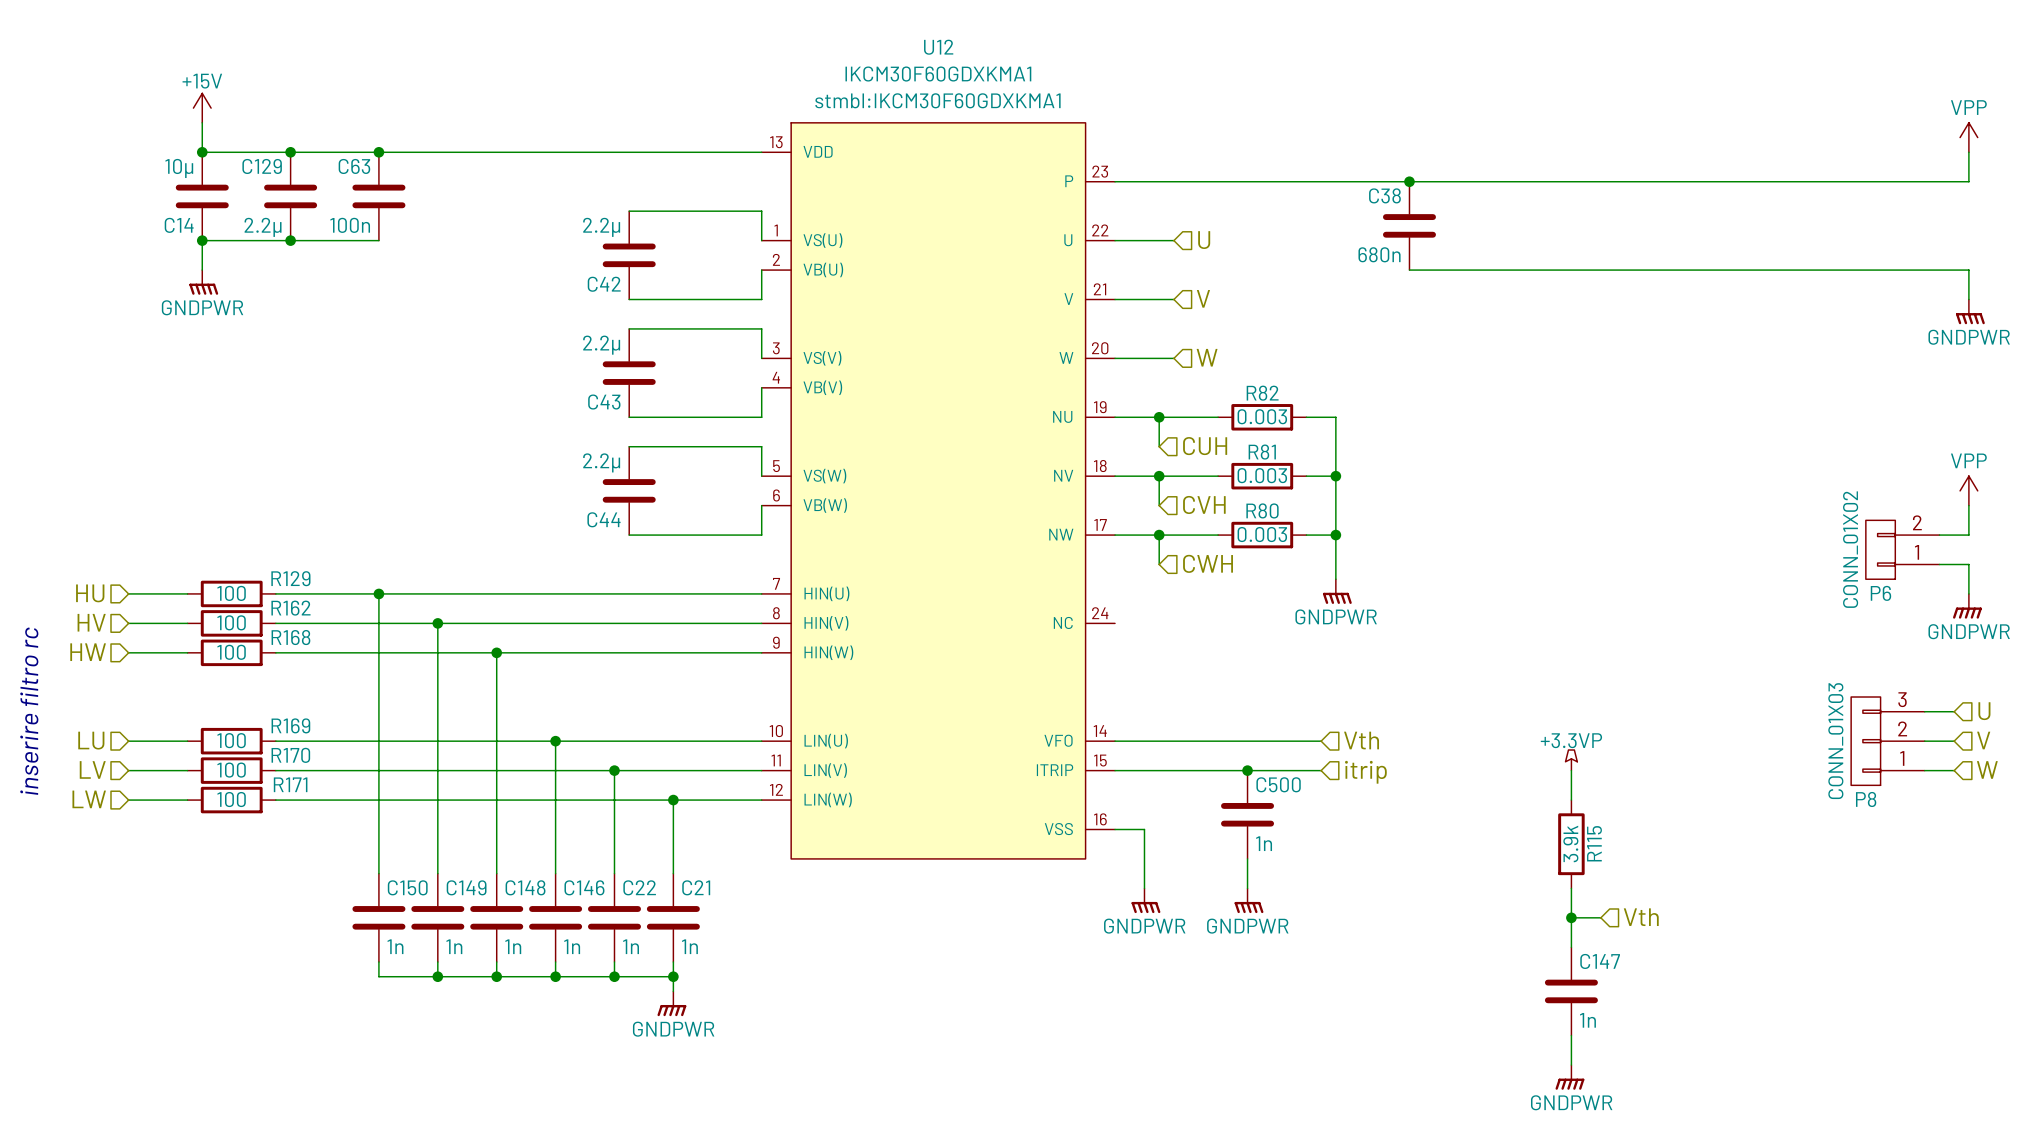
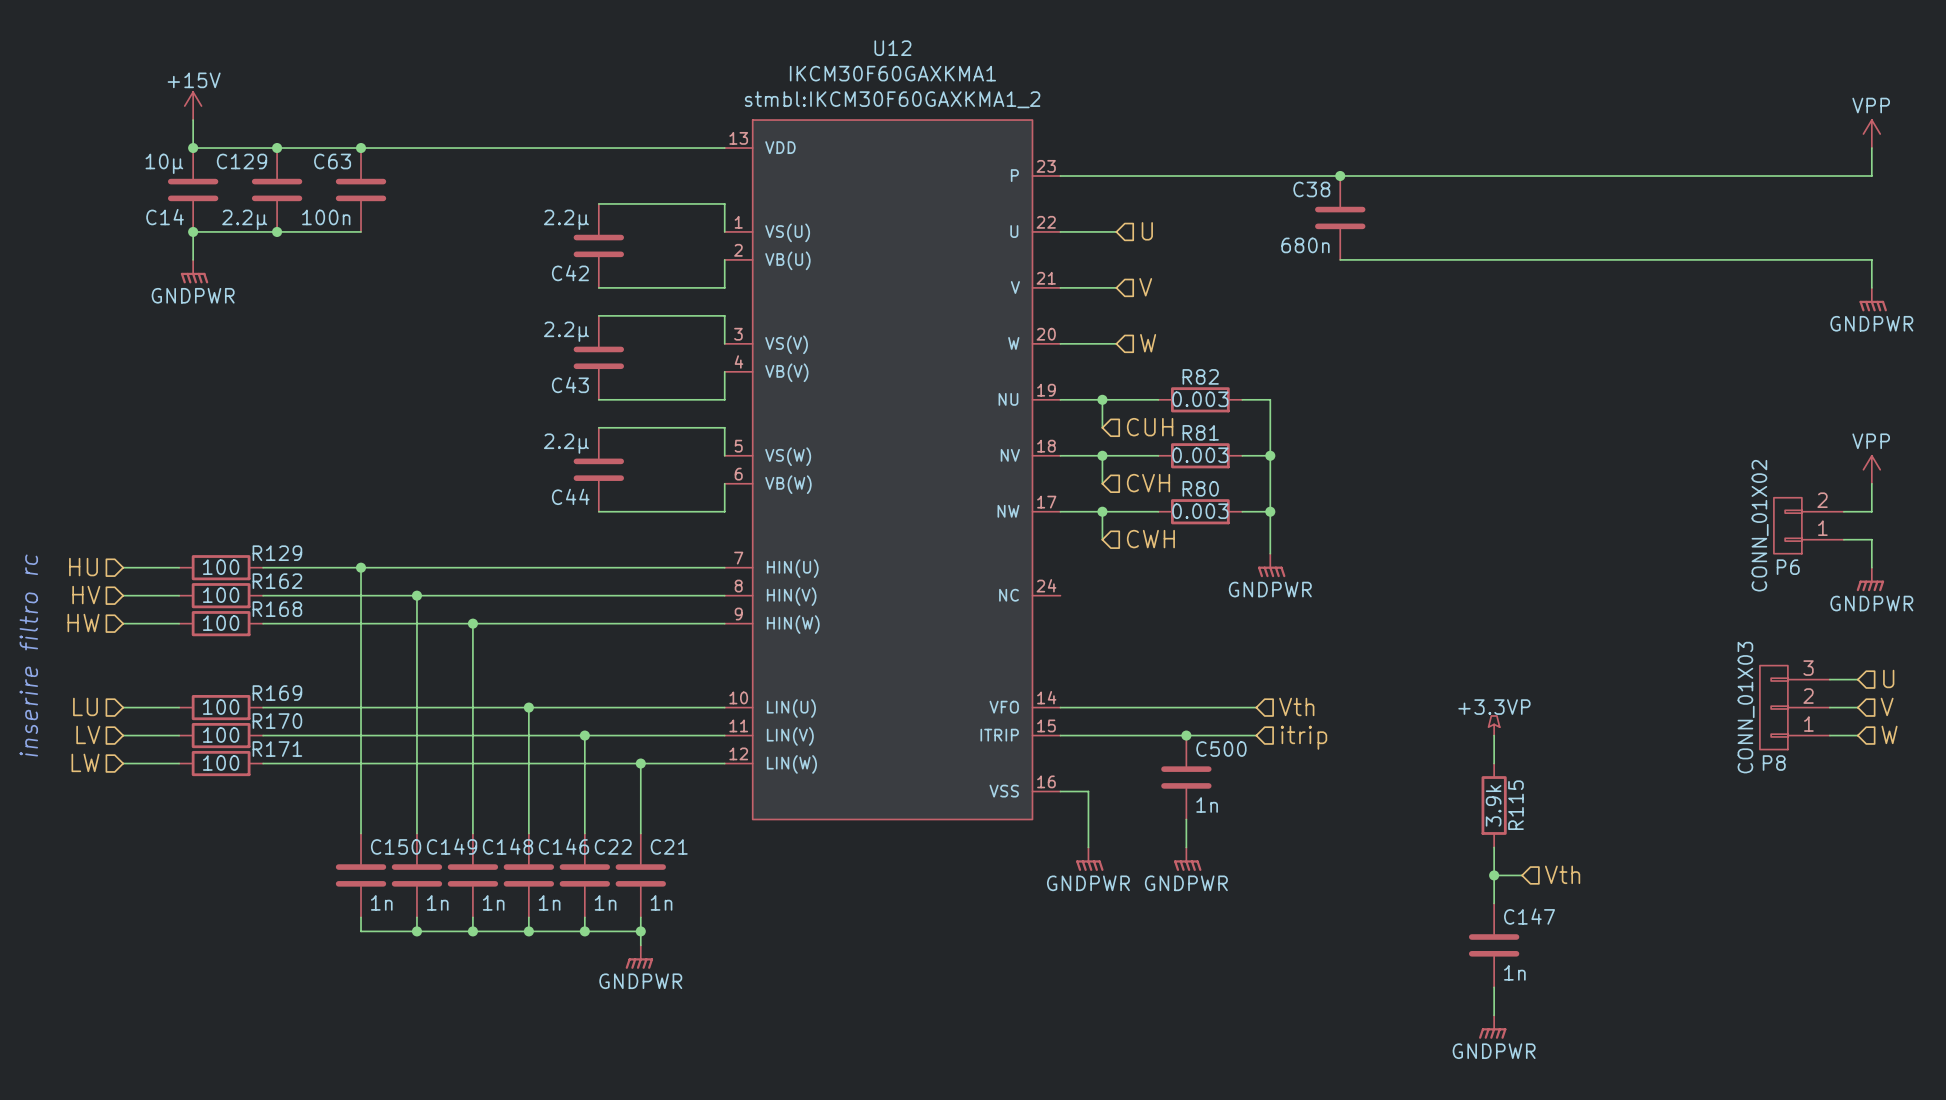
U12 value: IKCM30F60GDXKMA1 (938, 74) -> IKCM30F60GAXKMA1 (892, 73)
U12 text: stmbl:IKCM30F60GDXKMA1 (937, 100) -> stmbl:IKCM30F60GAXKMA1_2 (892, 99)

